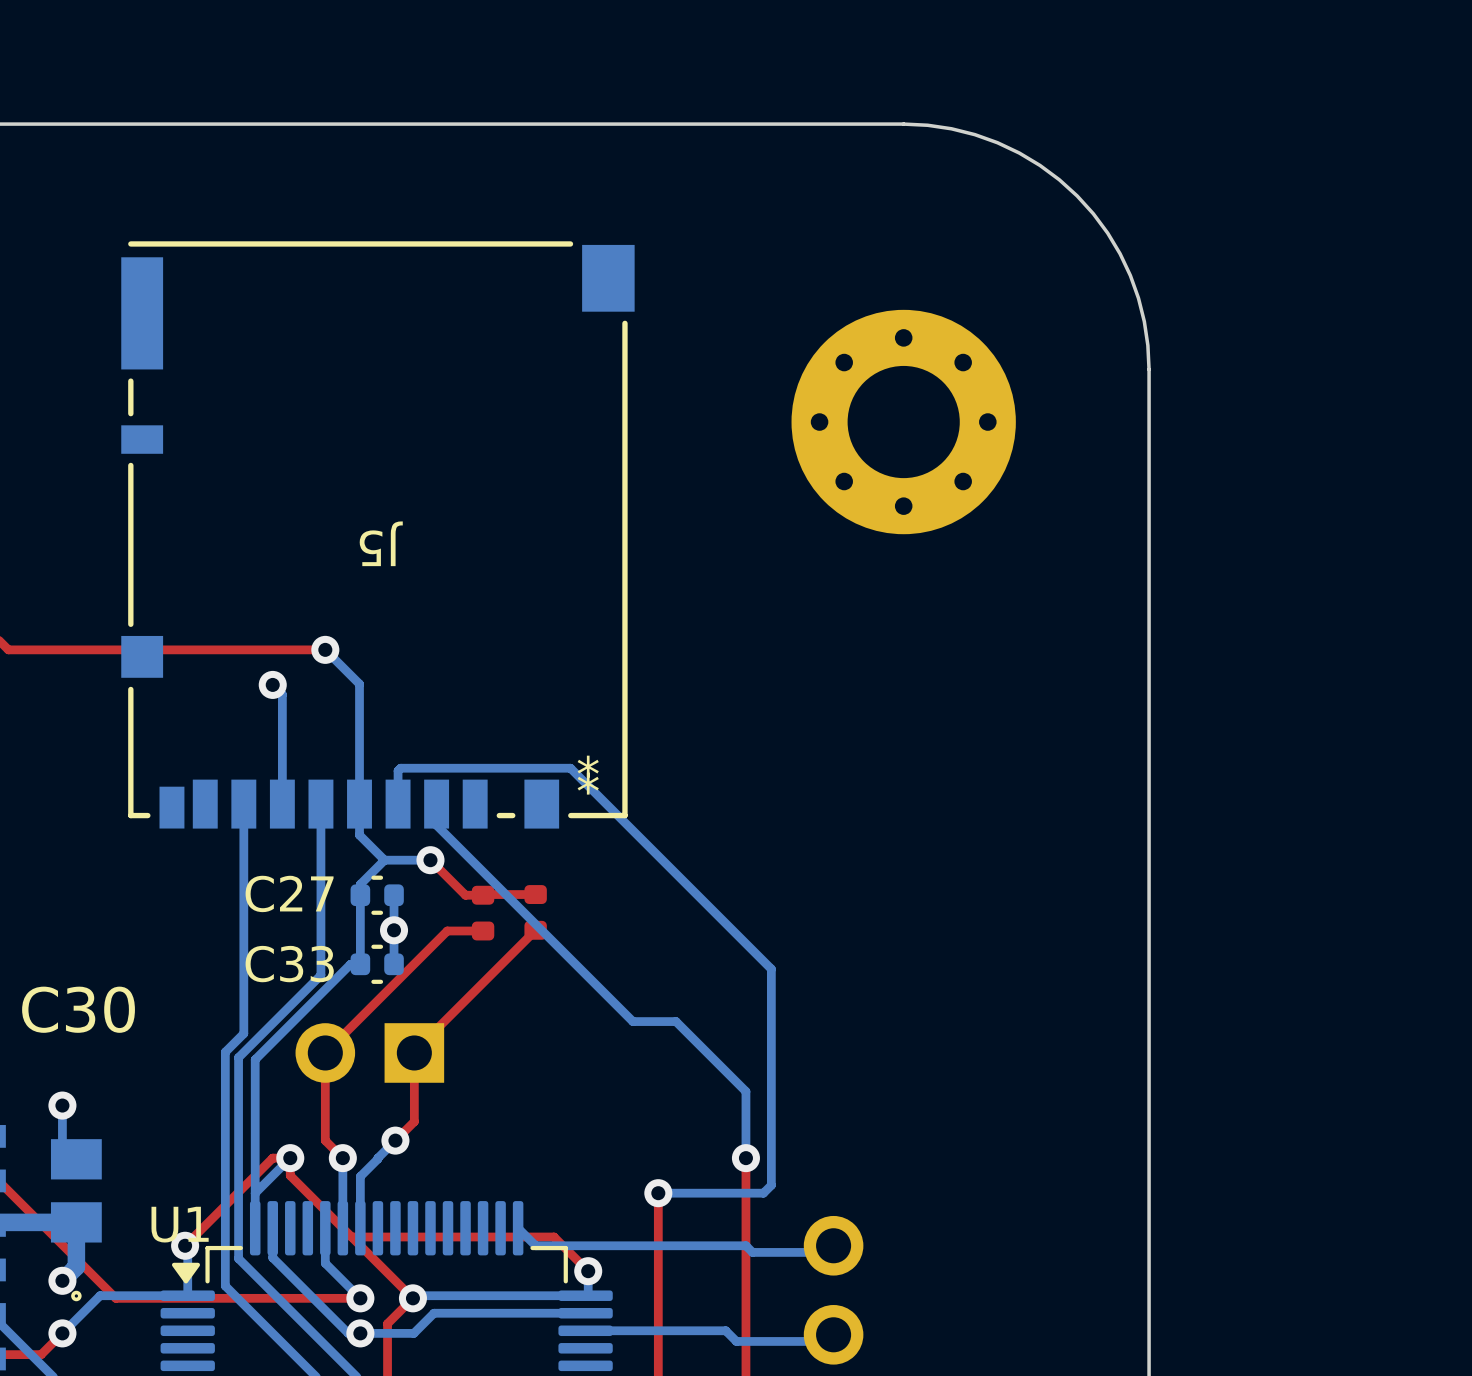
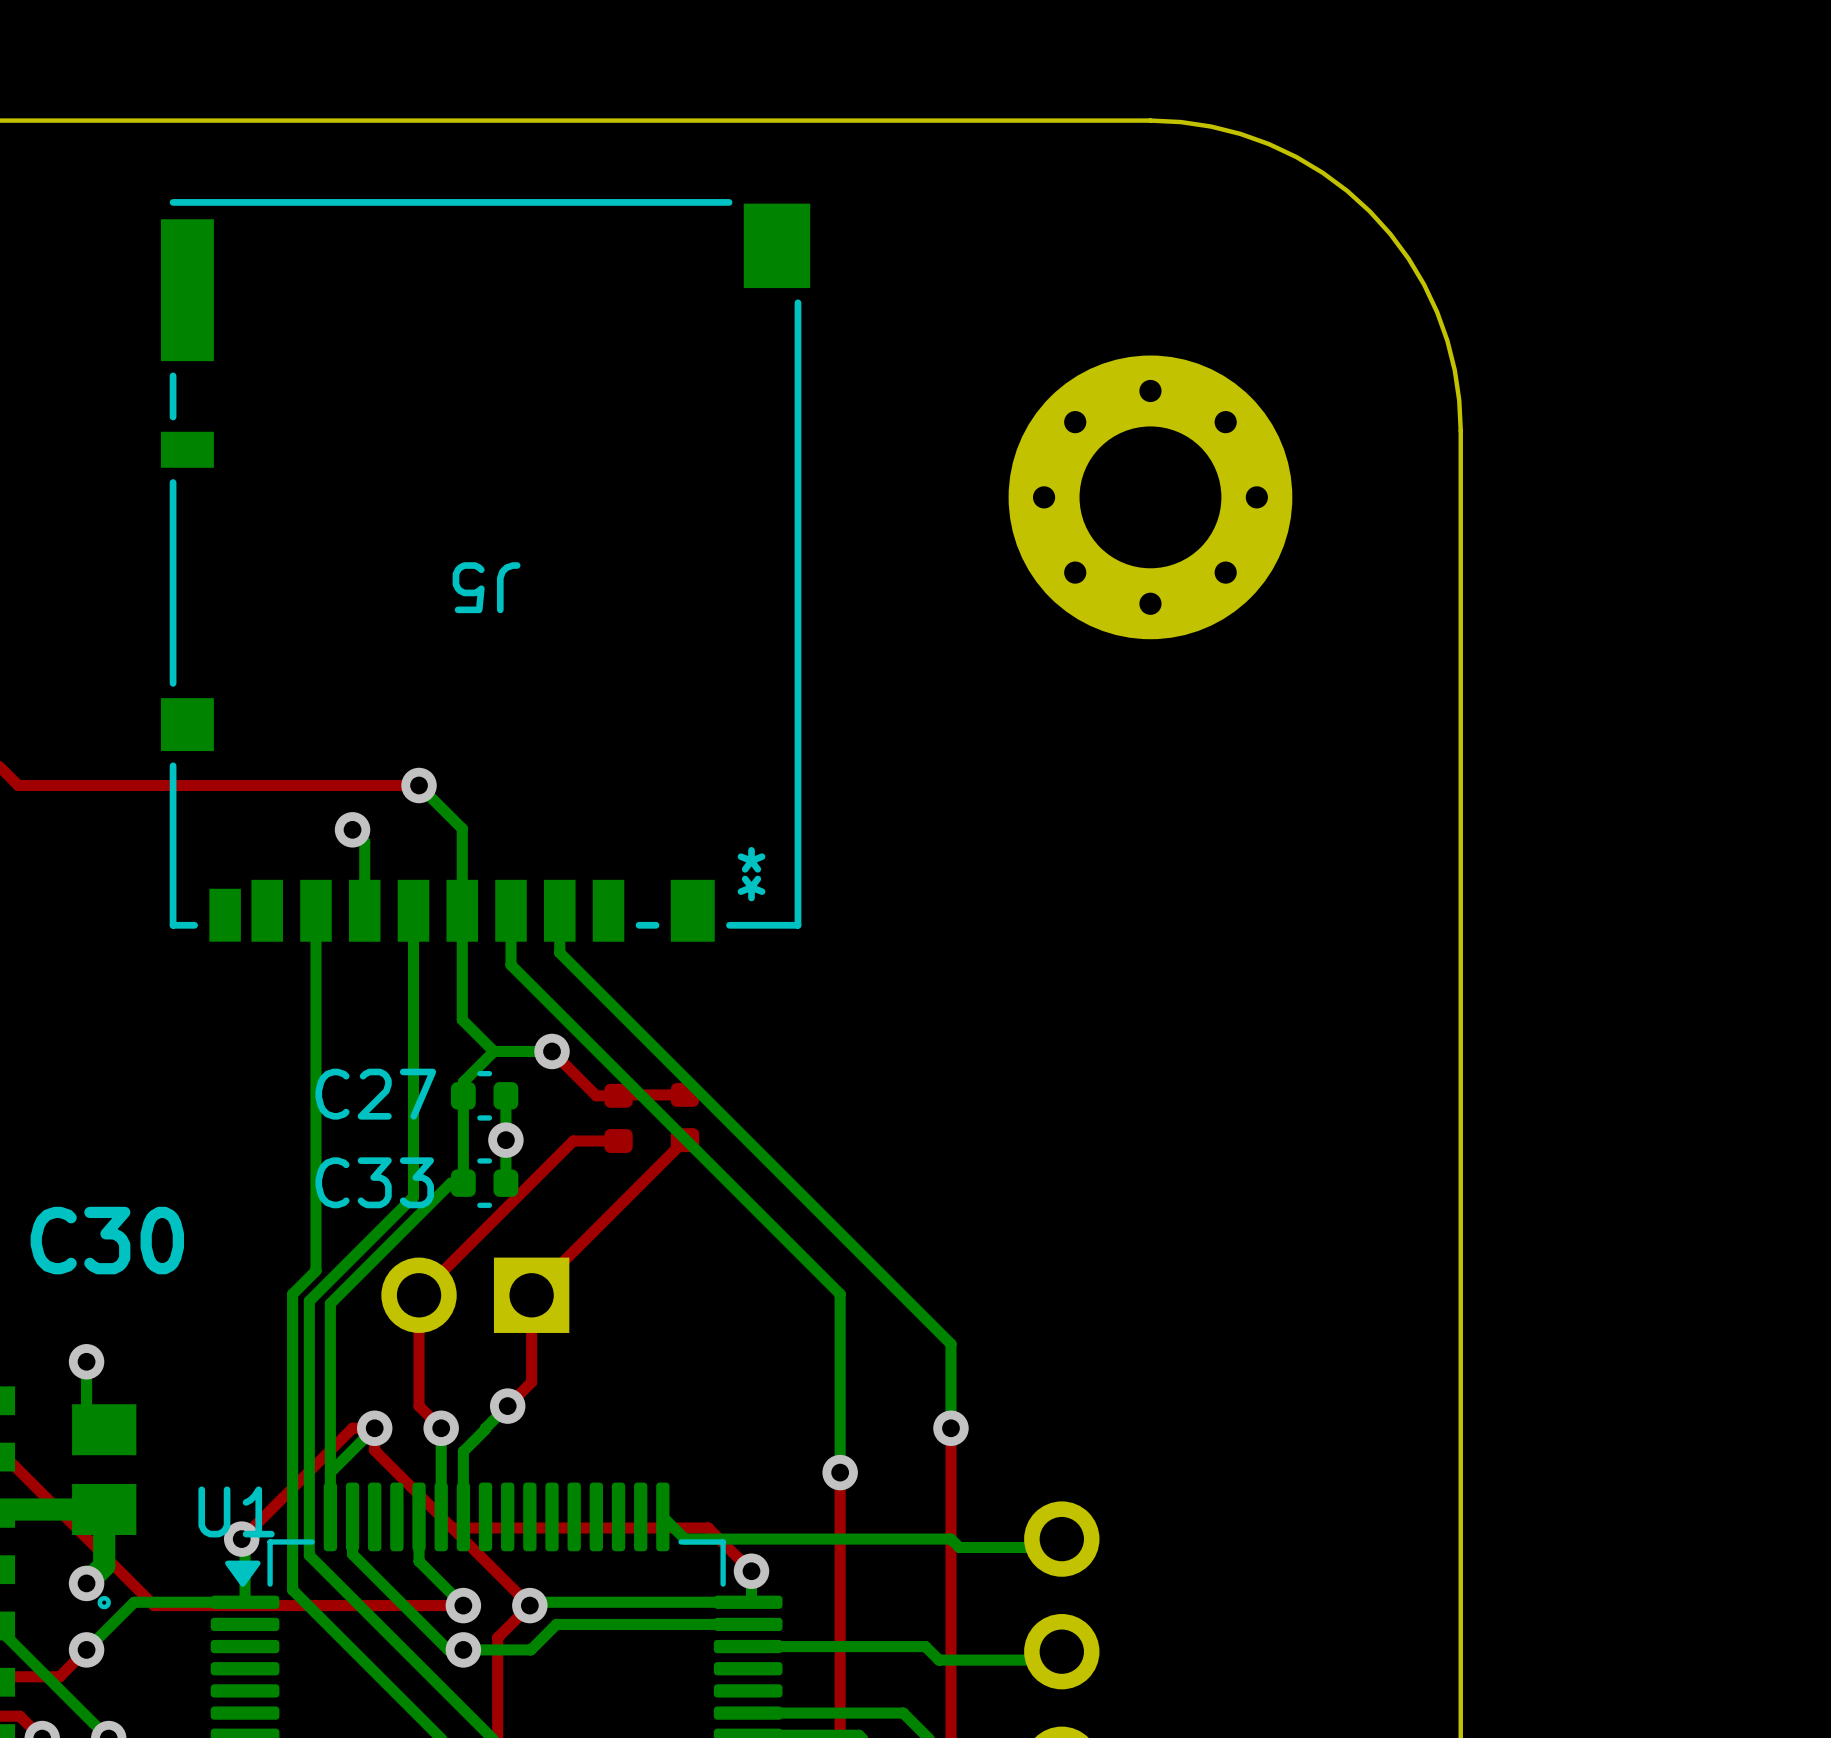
J5 position: (377, 534) -> (485, 570)
bottom track: (282, 748) (282, 804) -> (315, 910) (315, 980)
bottom track: none -> (413, 910) (413, 980)
bottom track: (398, 770) (400, 768) (570, 768) (771, 969) (771, 1185) (763, 1193) (658, 1193) -> (511, 965) (840, 1294) (840, 1472)
bottom track: (436, 804) (436, 825) (632, 1021) (675, 1021) -> (559, 910) (559, 952) (862, 1255)

